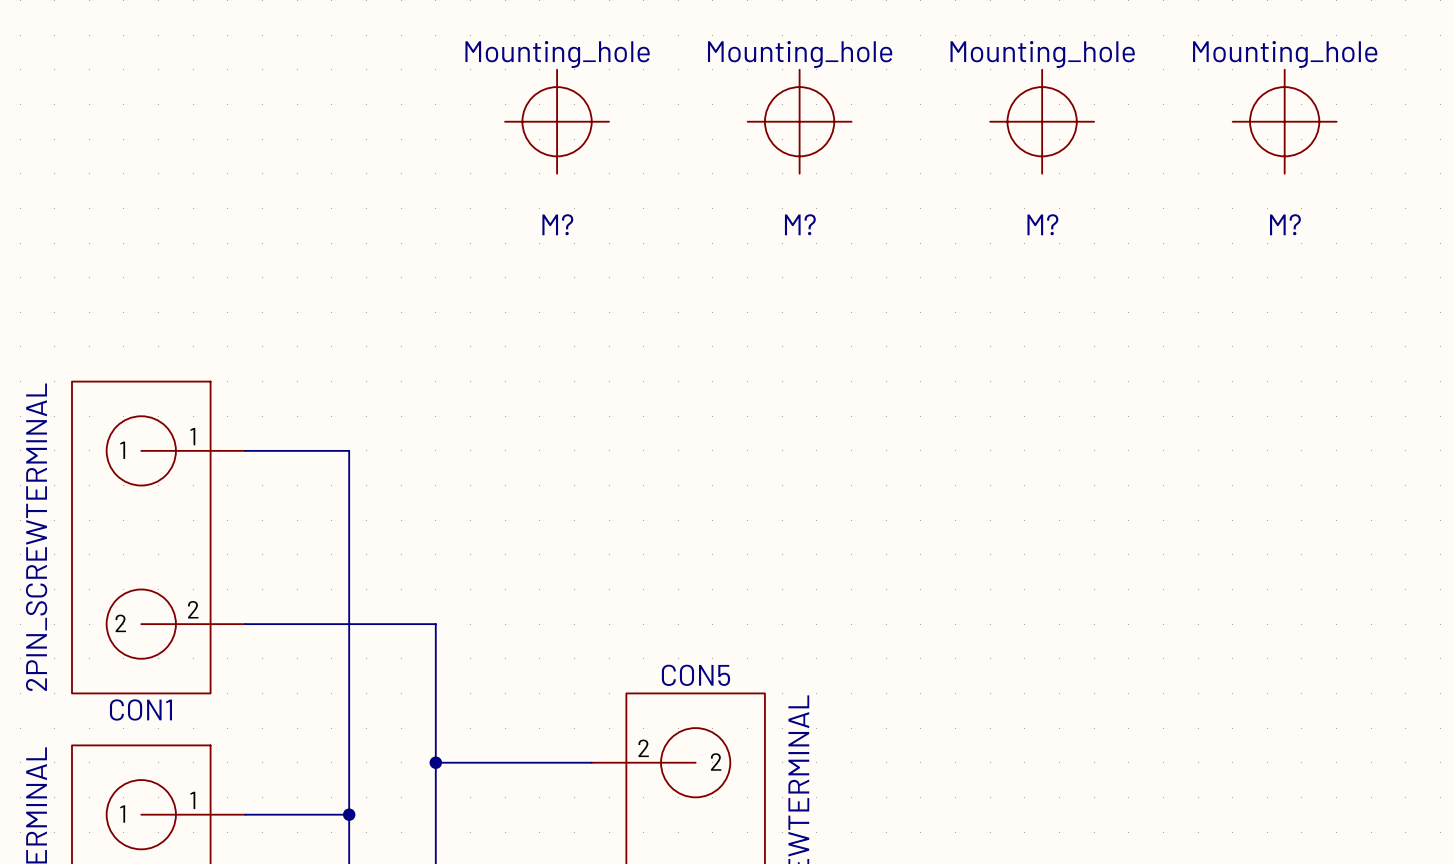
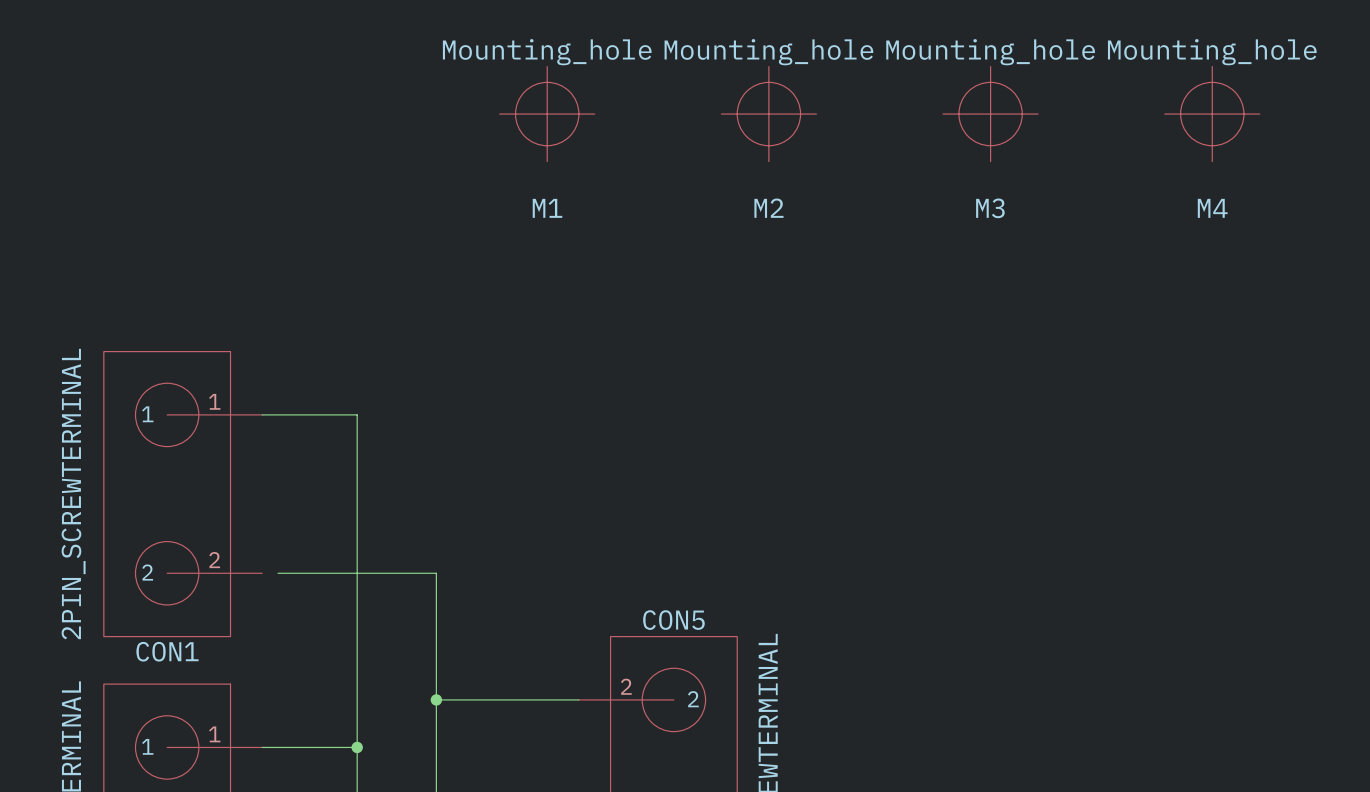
M? name: M? (557, 224) -> M1 (547, 208)
M? name: M? (800, 224) -> M2 (768, 208)
M? name: M? (1042, 224) -> M3 (990, 208)
M? name: M? (1285, 224) -> M4 (1212, 208)
wire: (245, 624) (262, 624) -> none

